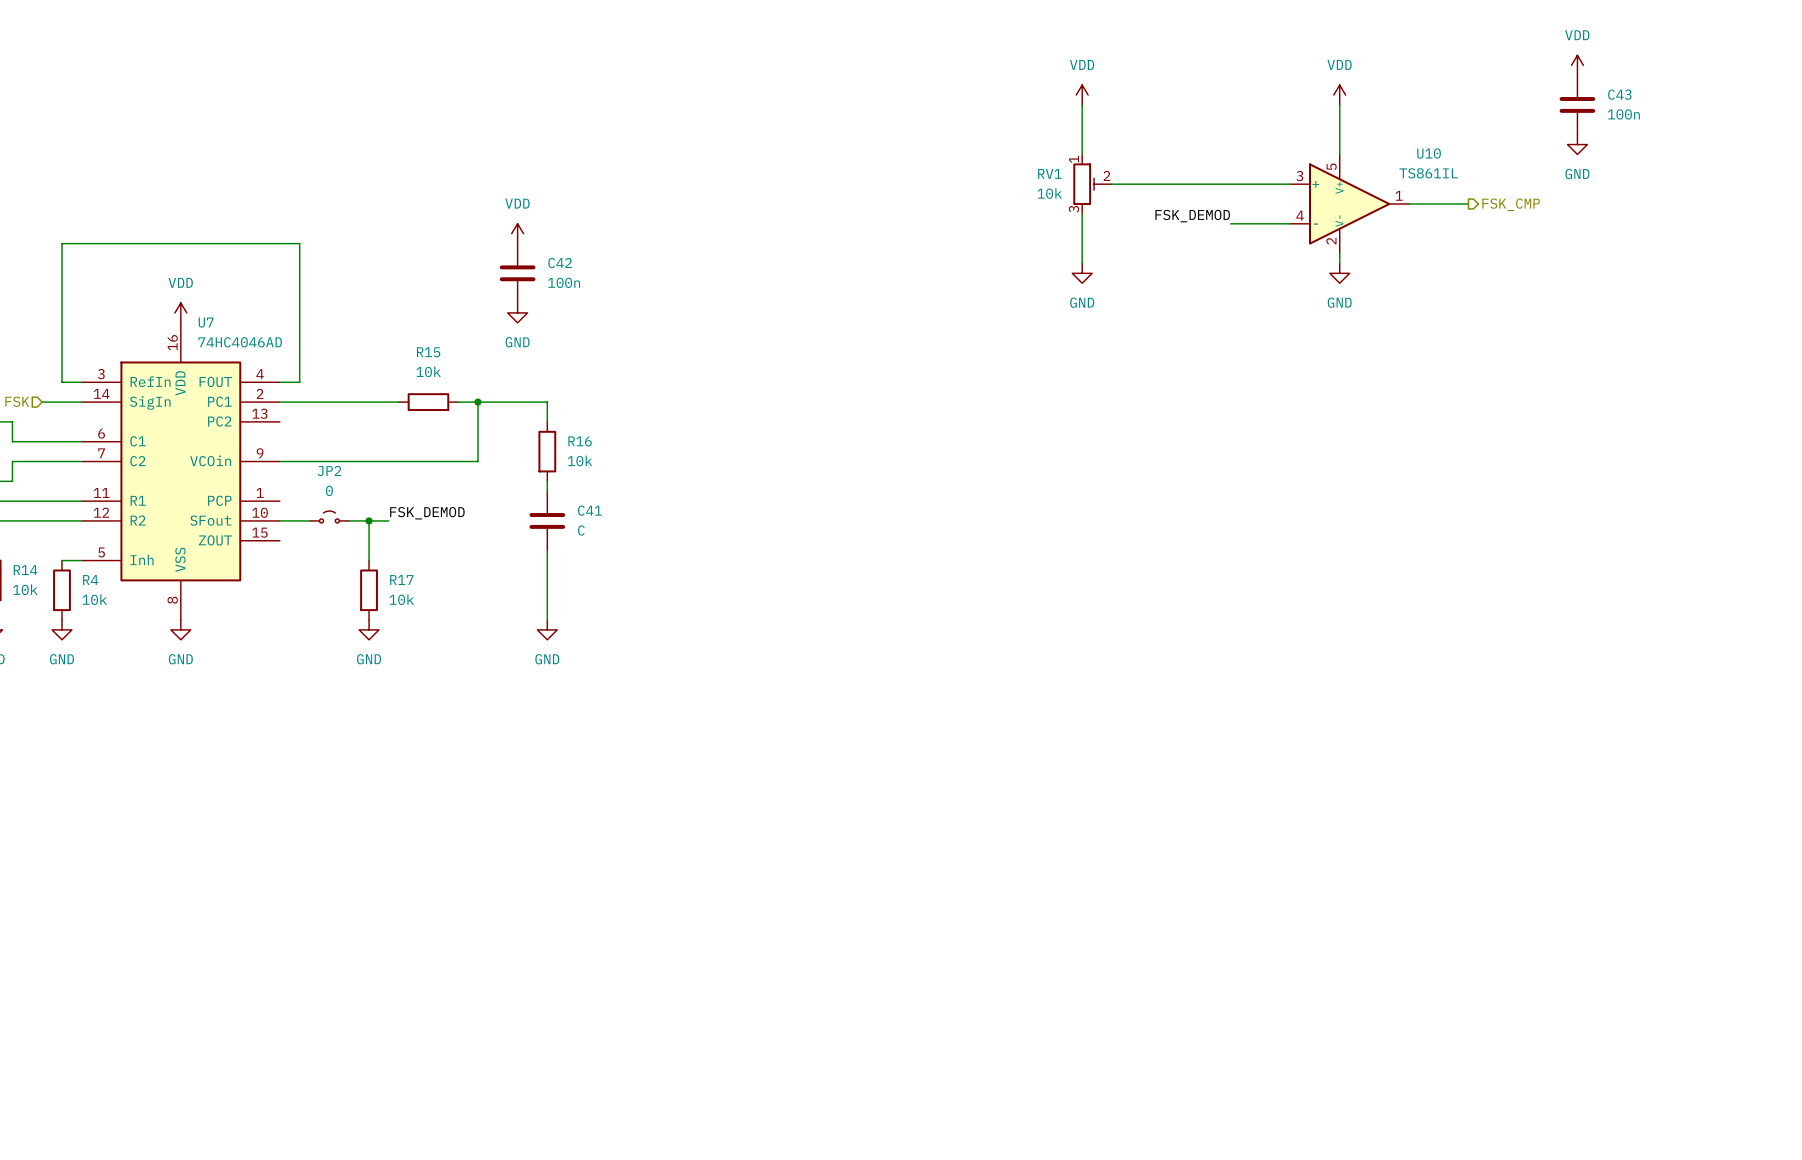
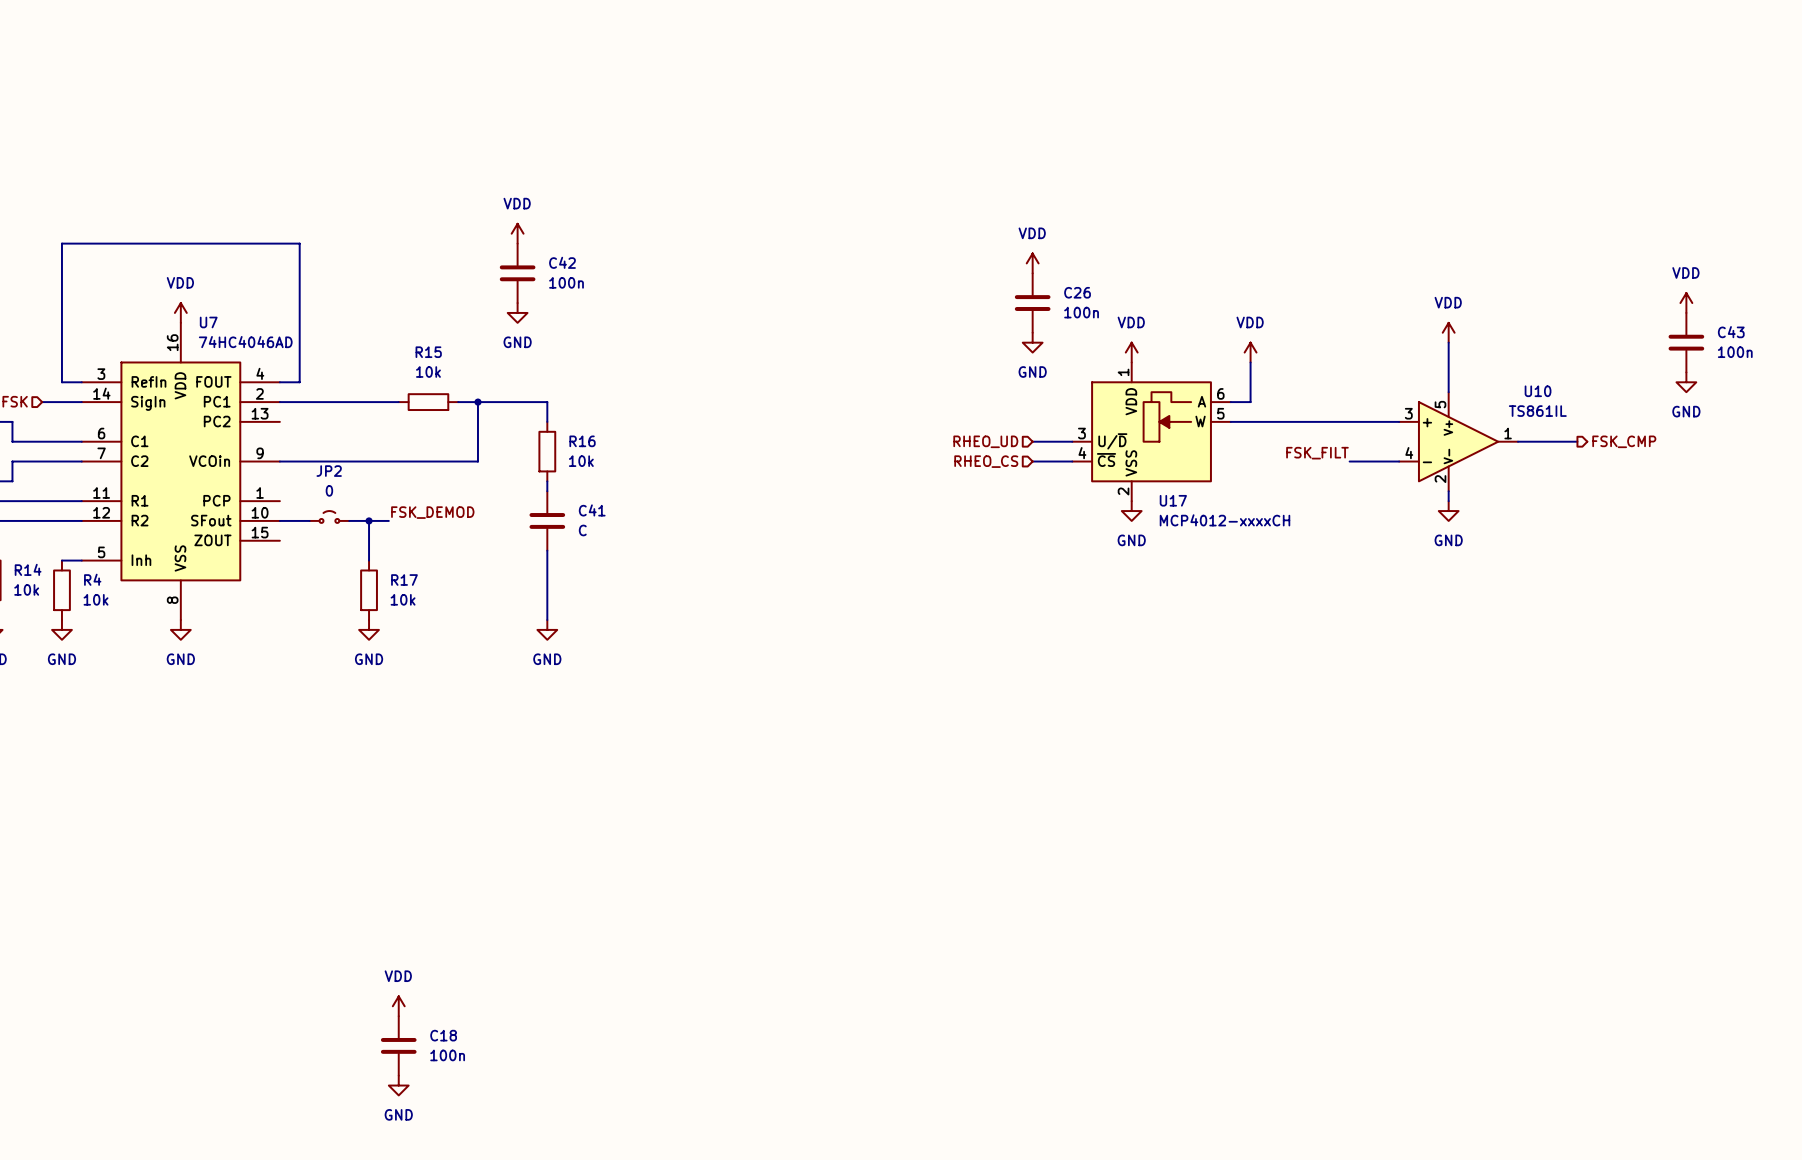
power symbol: VDD (1577, 65) -> none
power symbol: VDD (1082, 95) -> none
power symbol: VDD (1339, 95) -> none
wire: (1082, 104) (1082, 154) -> none
wire: (1339, 104) (1339, 154) -> none
C43 position: (1577, 104) -> (1686, 342)
power symbol: GND (1577, 144) -> none
RV1: 10k (1092, 184) -> none
wire: (1111, 184) (1290, 184) -> none
U10 position: (1349, 203) -> (1458, 441)
wire: (1409, 203) (1468, 203) -> none
hierarchical label: FSK_CMP (1511, 204) -> none
wire: (1082, 213) (1082, 263) -> none
label: FSK_DEMOD (1192, 216) -> none
wire: (1230, 223) (1290, 223) -> none
wire: (1339, 253) (1339, 263) -> none
power symbol: none -> VDD (1032, 263)
power symbol position: GND (1082, 273) -> GND (1032, 342)
power symbol: GND (1339, 273) -> none
C26: none -> 100n (1032, 303)
power symbol: none -> VDD (1686, 303)
power symbol: none -> VDD (1448, 332)
wire: none -> (1448, 342) (1448, 392)
power symbol: none -> VDD (1131, 352)
power symbol: none -> VDD (1250, 352)
wire: none -> (1250, 362) (1250, 402) (1230, 402)
power symbol: none -> GND (1686, 382)
wire: none -> (1230, 421) (1399, 421)
U17: none -> MCP4012-xxxxCH (1151, 431)
wire: none -> (1032, 441) (1072, 441)
wire: none -> (1518, 441) (1577, 441)
hierarchical label: none -> RHEO_UD (985, 441)
hierarchical label: none -> FSK_CMP (1624, 441)
label: none -> FSK_FILT (1317, 453)
wire: none -> (1032, 461) (1072, 461)
wire: none -> (1349, 461) (1399, 461)
hierarchical label: none -> RHEO_CS (986, 461)
wire: none -> (1448, 491) (1448, 501)
power symbol: none -> GND (1131, 511)
power symbol: none -> GND (1448, 511)
power symbol: none -> VDD (398, 1006)
C18: none -> 100n (398, 1045)
power symbol: none -> GND (398, 1085)

